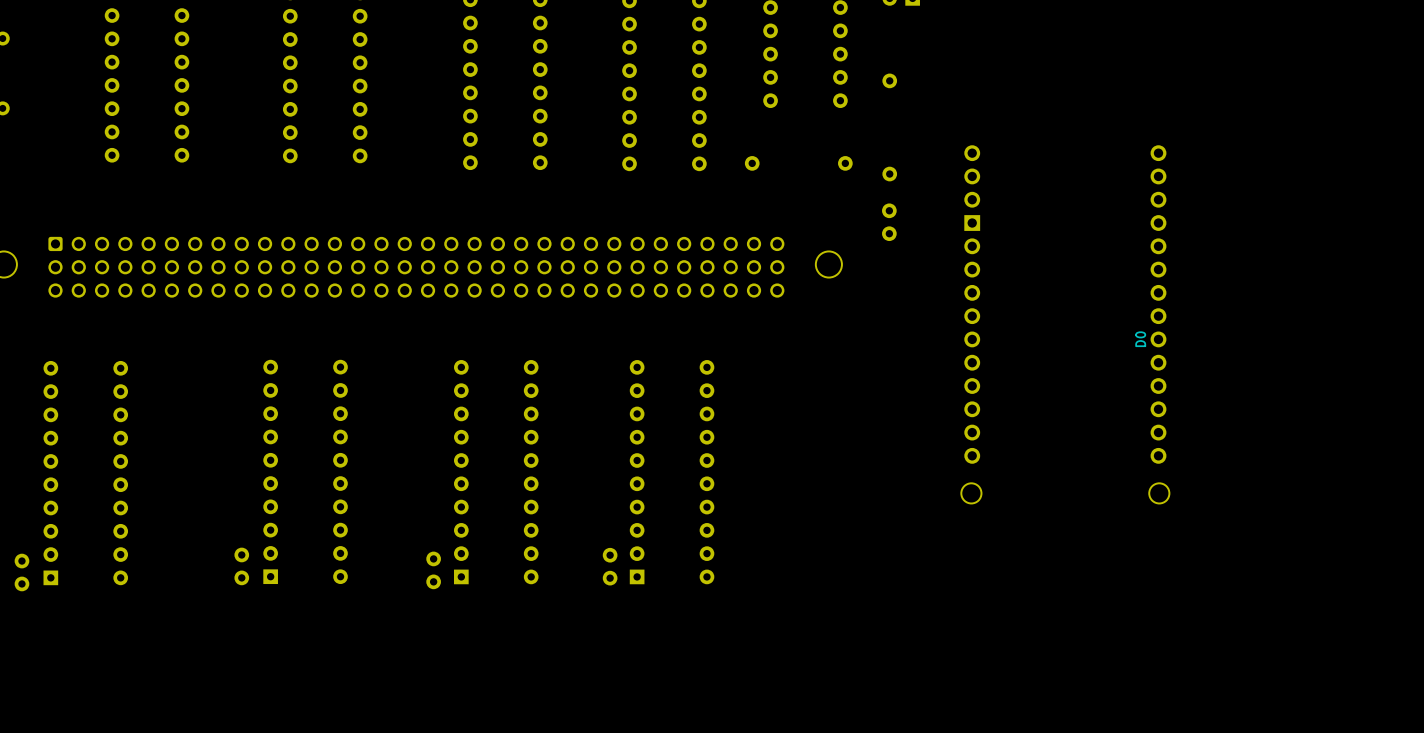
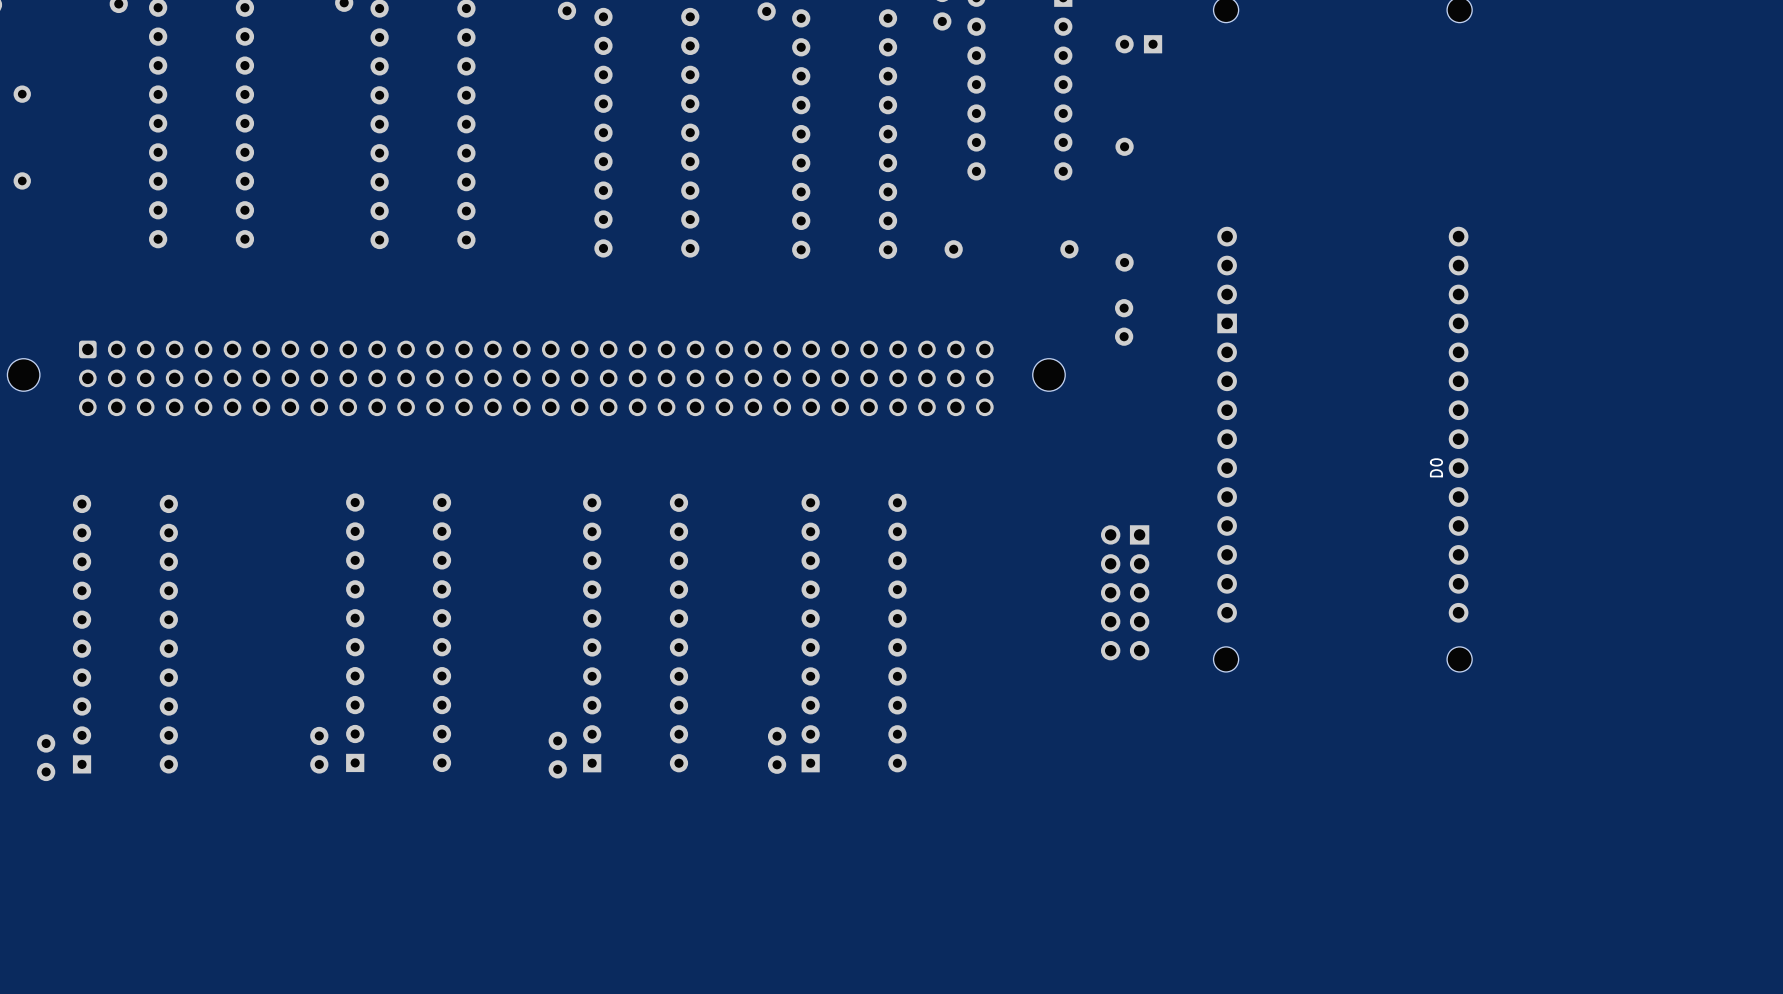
part: none -> (1125, 592)

